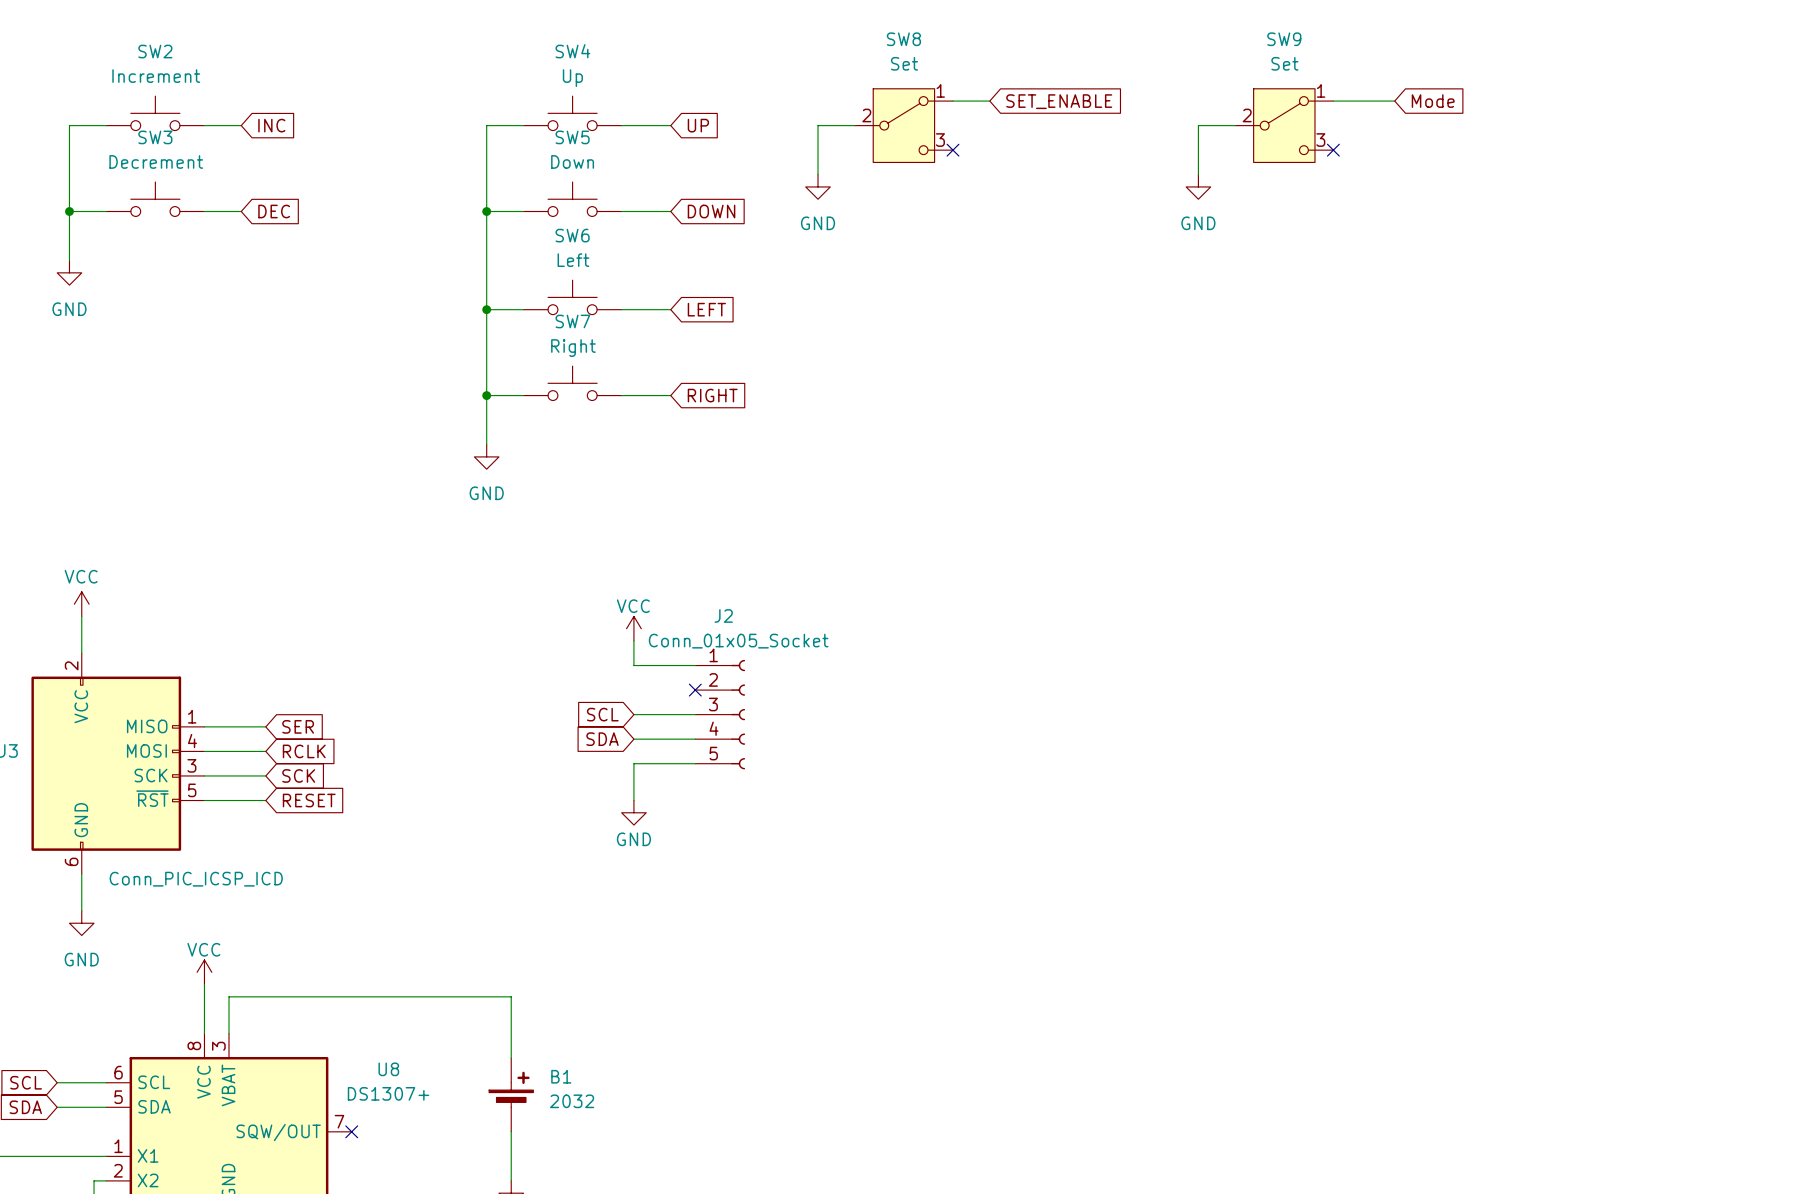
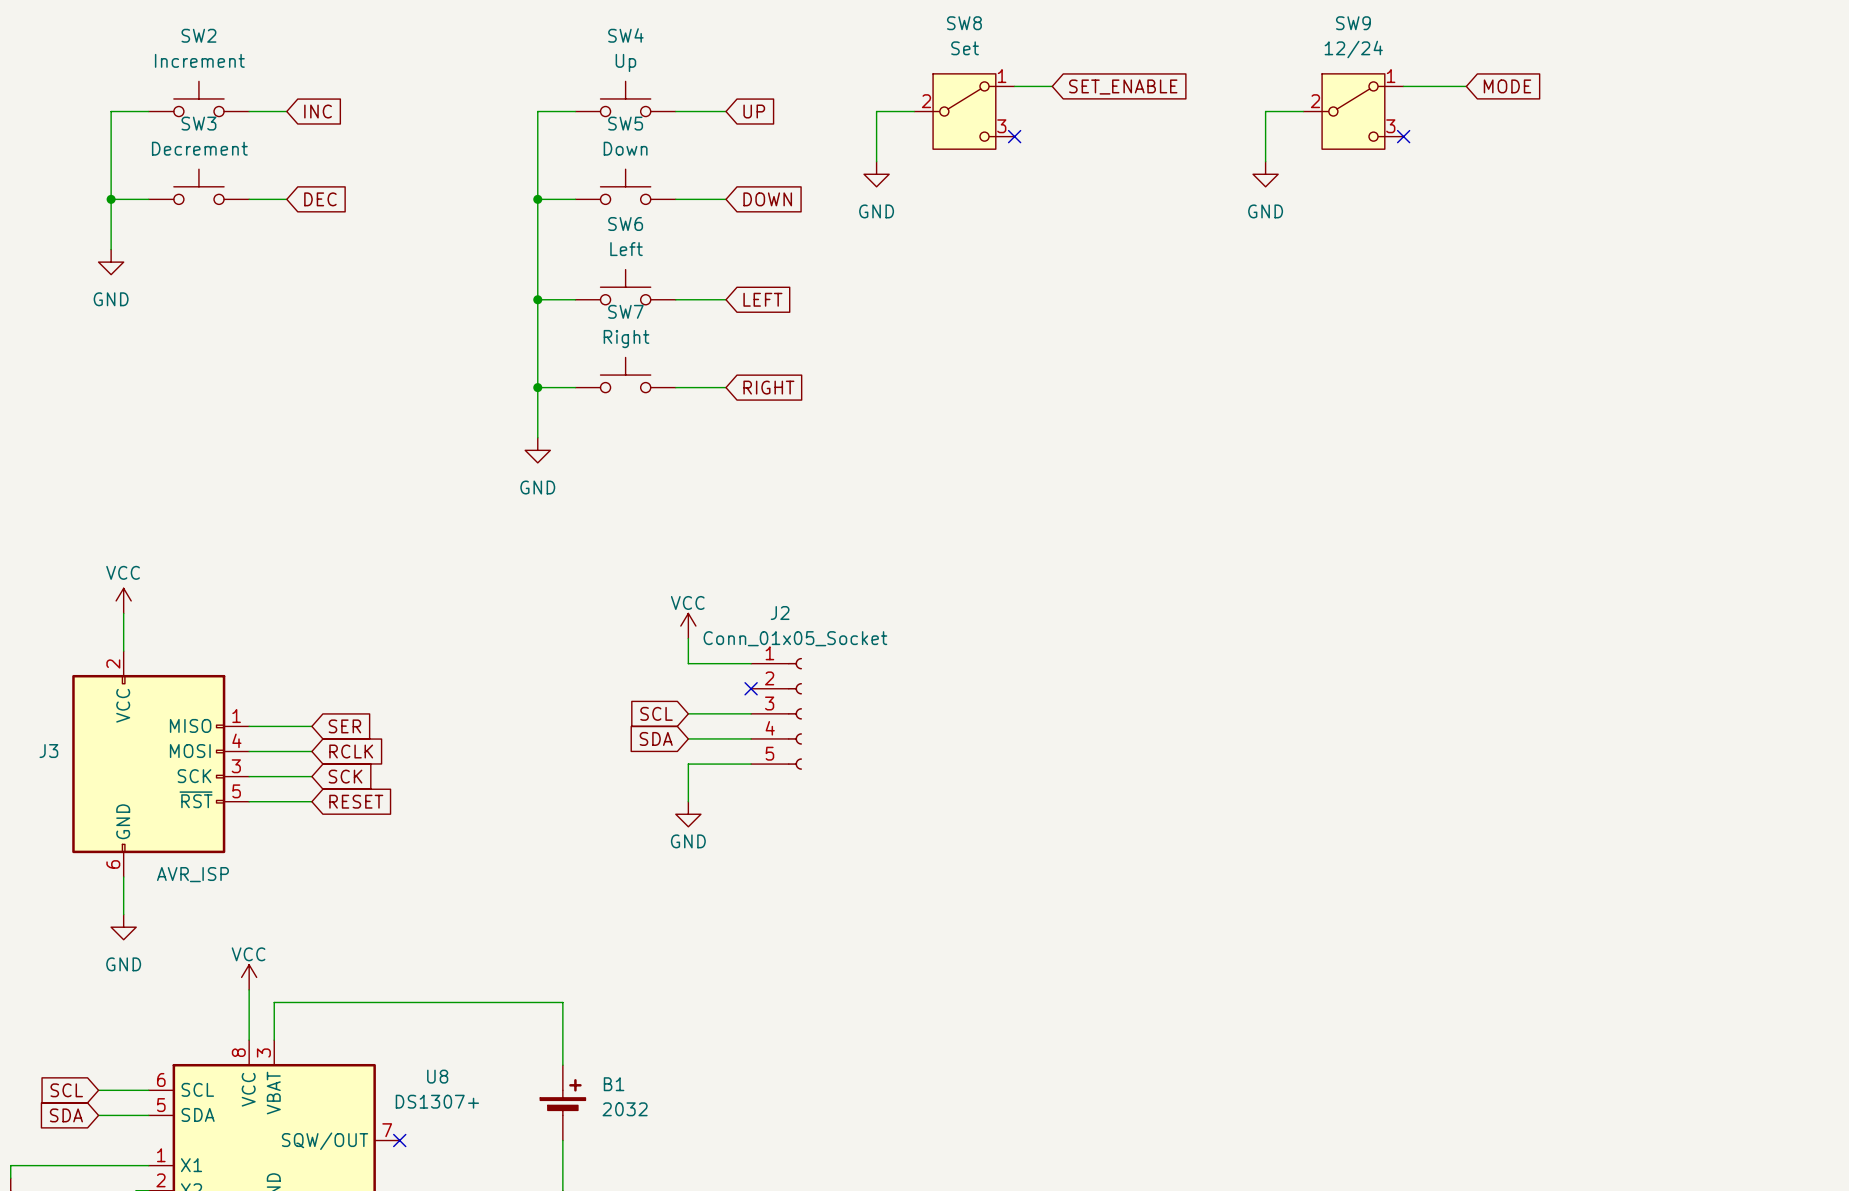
SW9 value: Set (1284, 63) -> 12/24 (1353, 49)
global label: Mode (1433, 101) -> MODE (1507, 86)
J3 value: Conn_PIC_ICSP_ICD (196, 879) -> AVR_ISP (192, 874)

